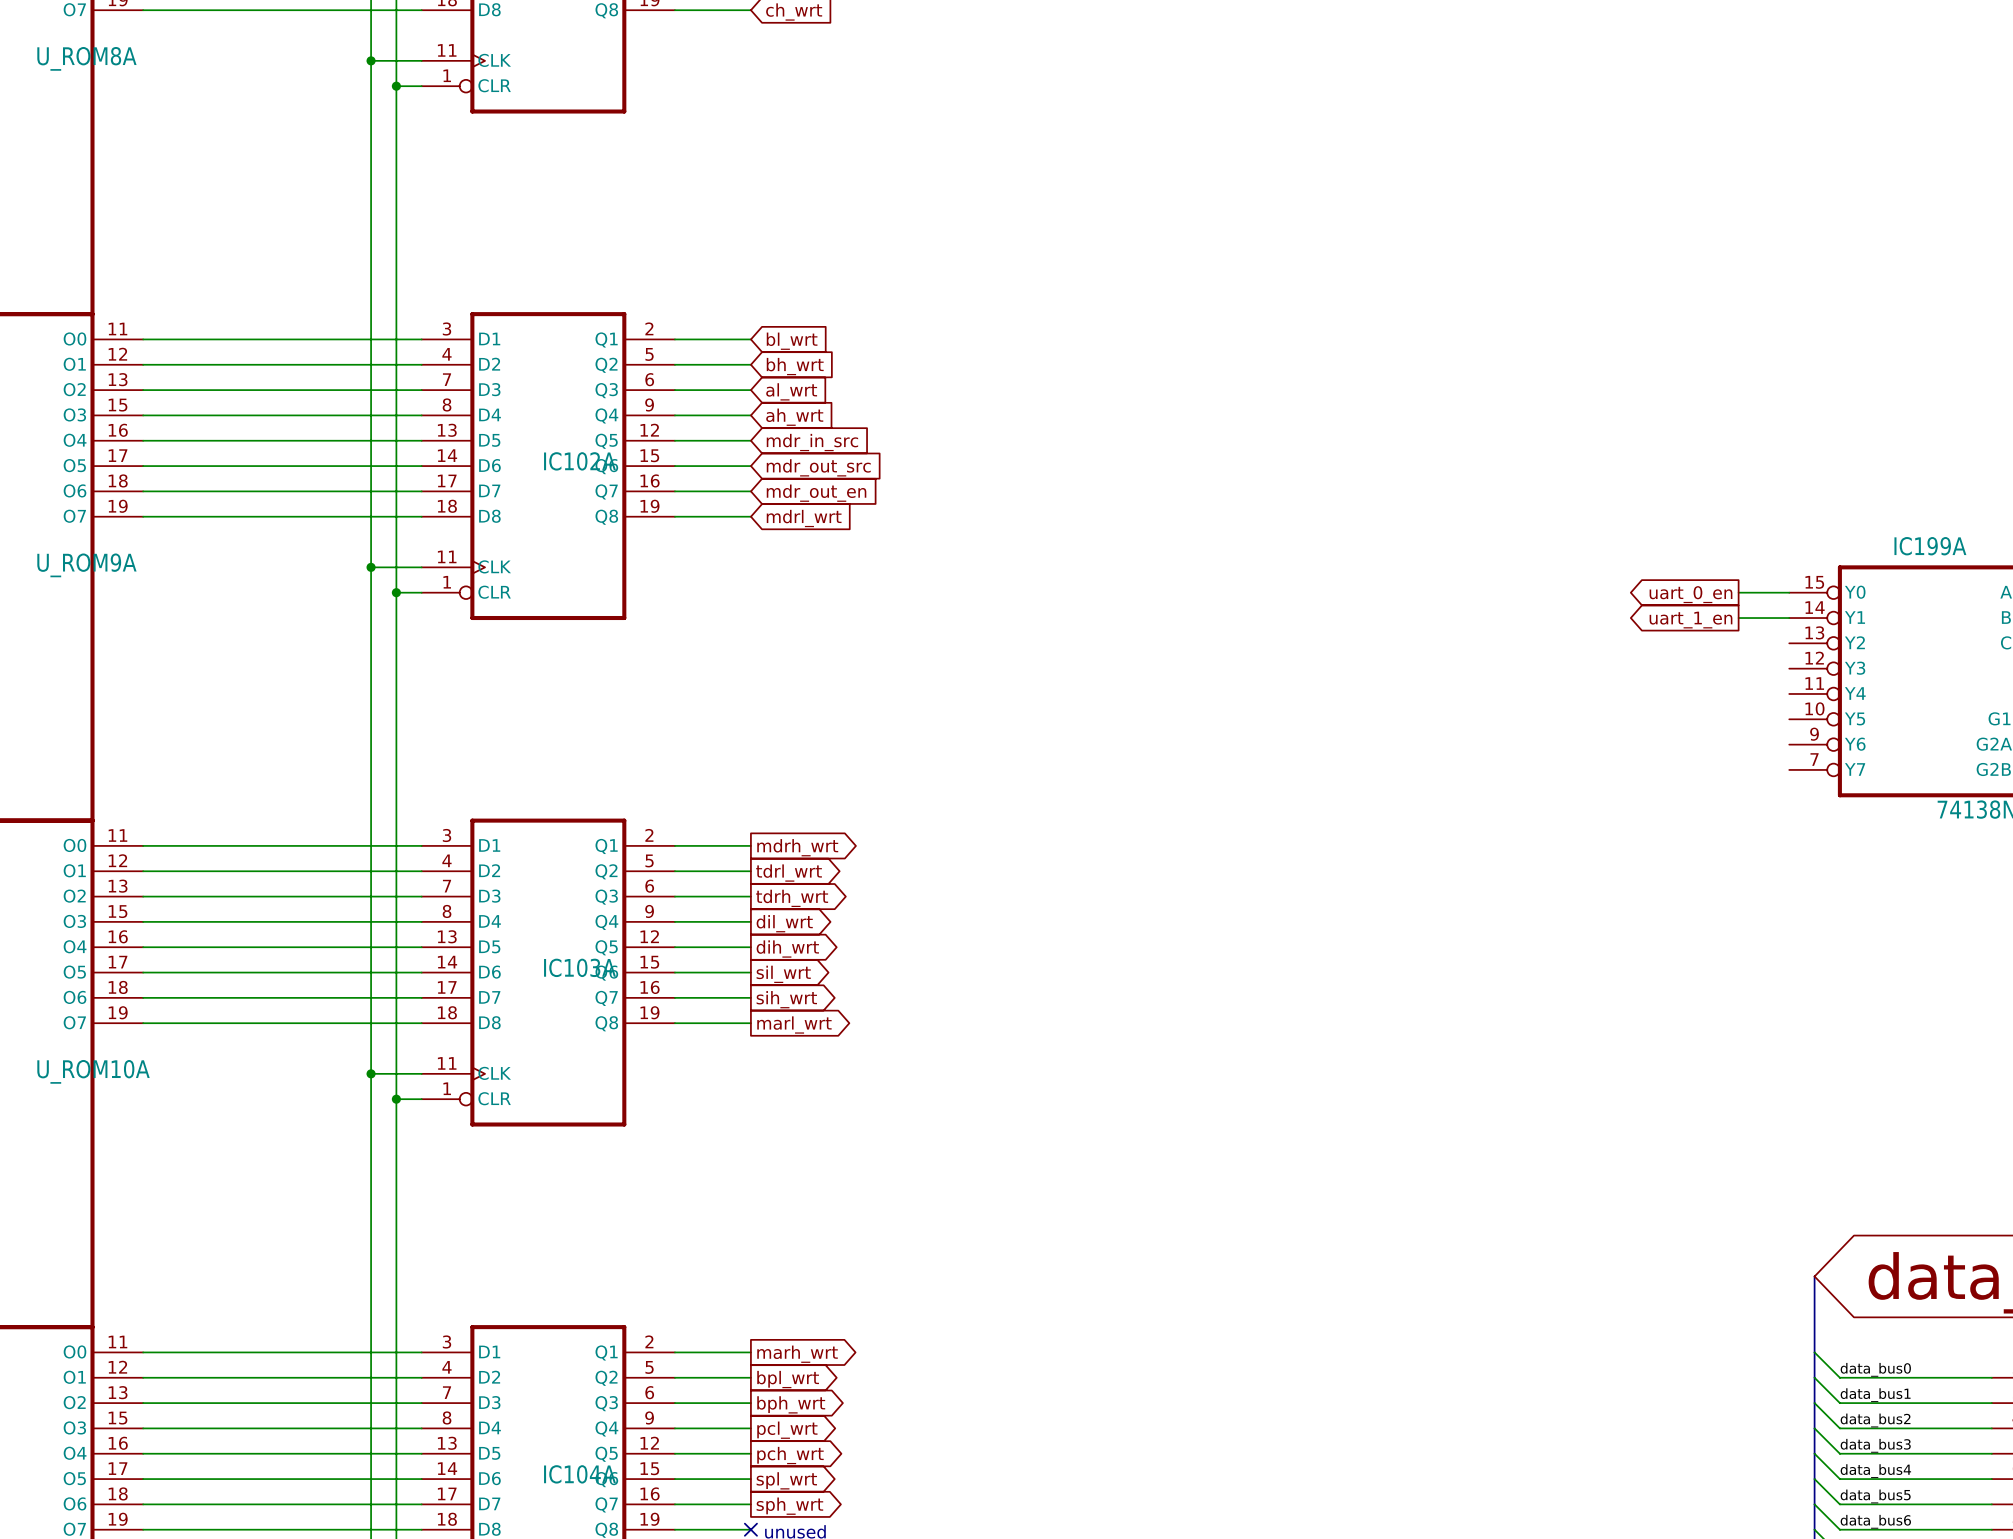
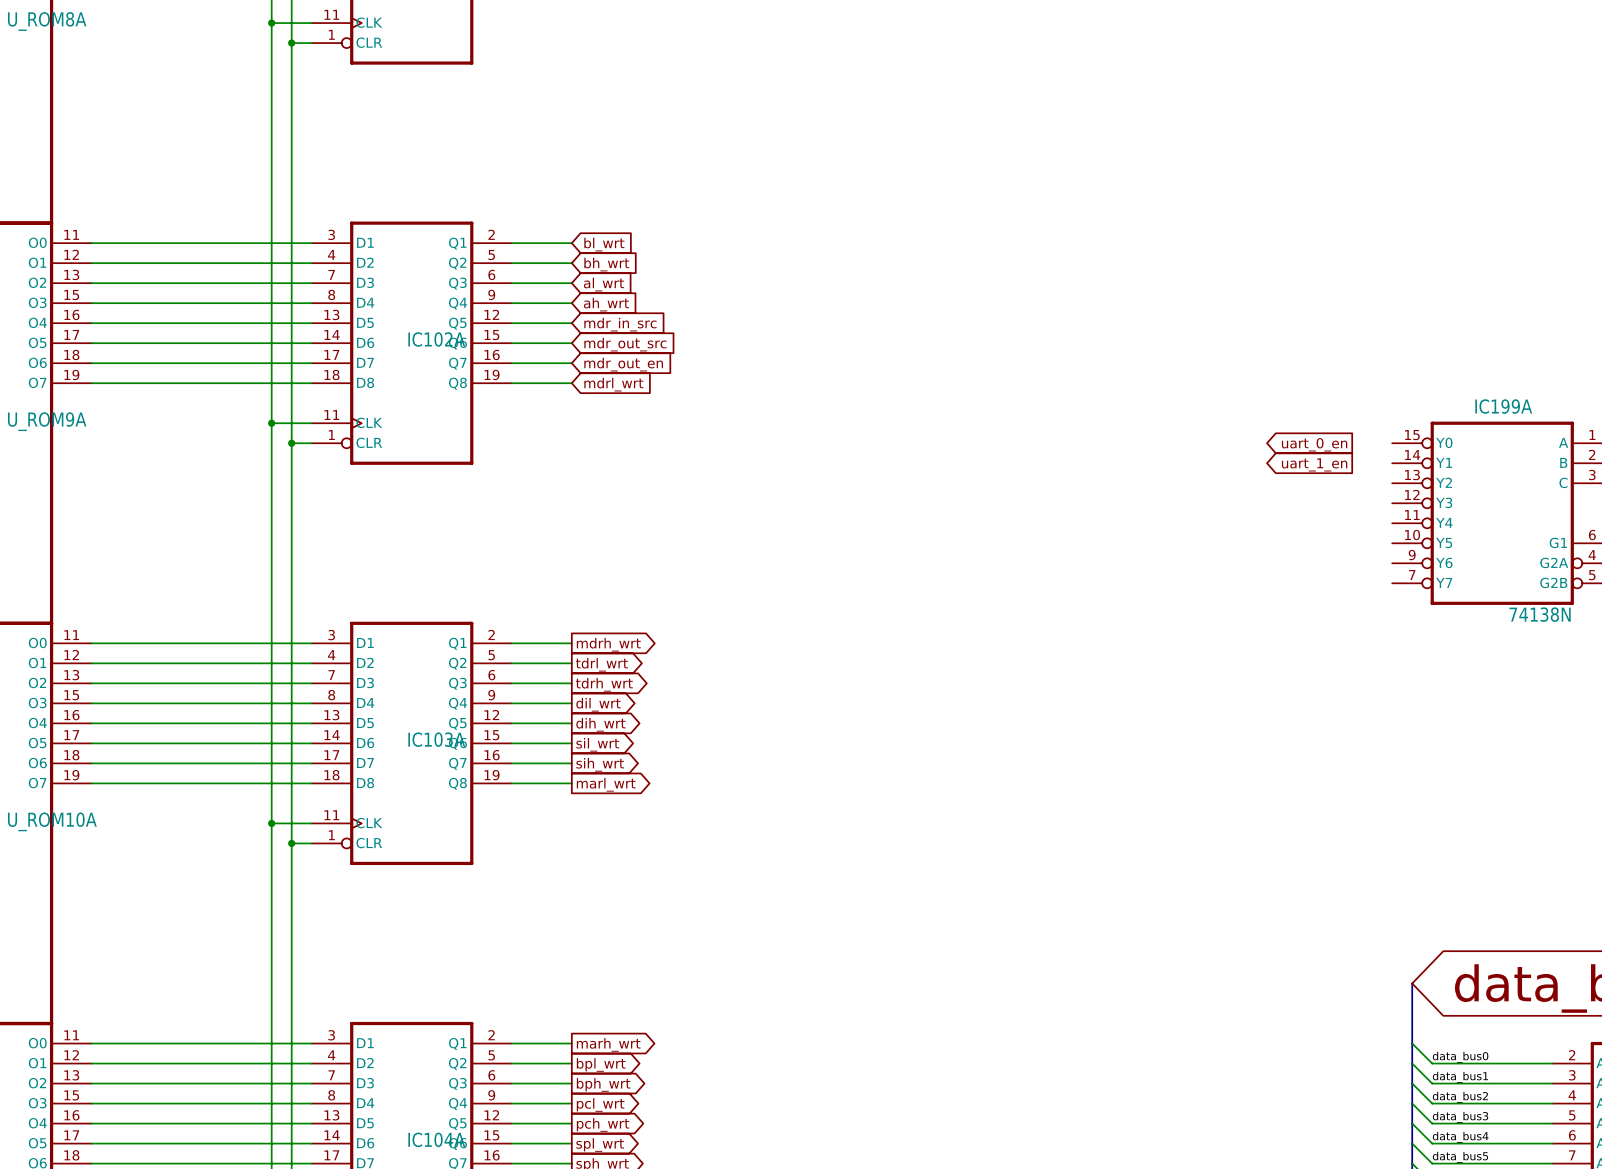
wire: (1738, 592) (1789, 592) -> none
wire: (1738, 618) (1789, 618) -> none

